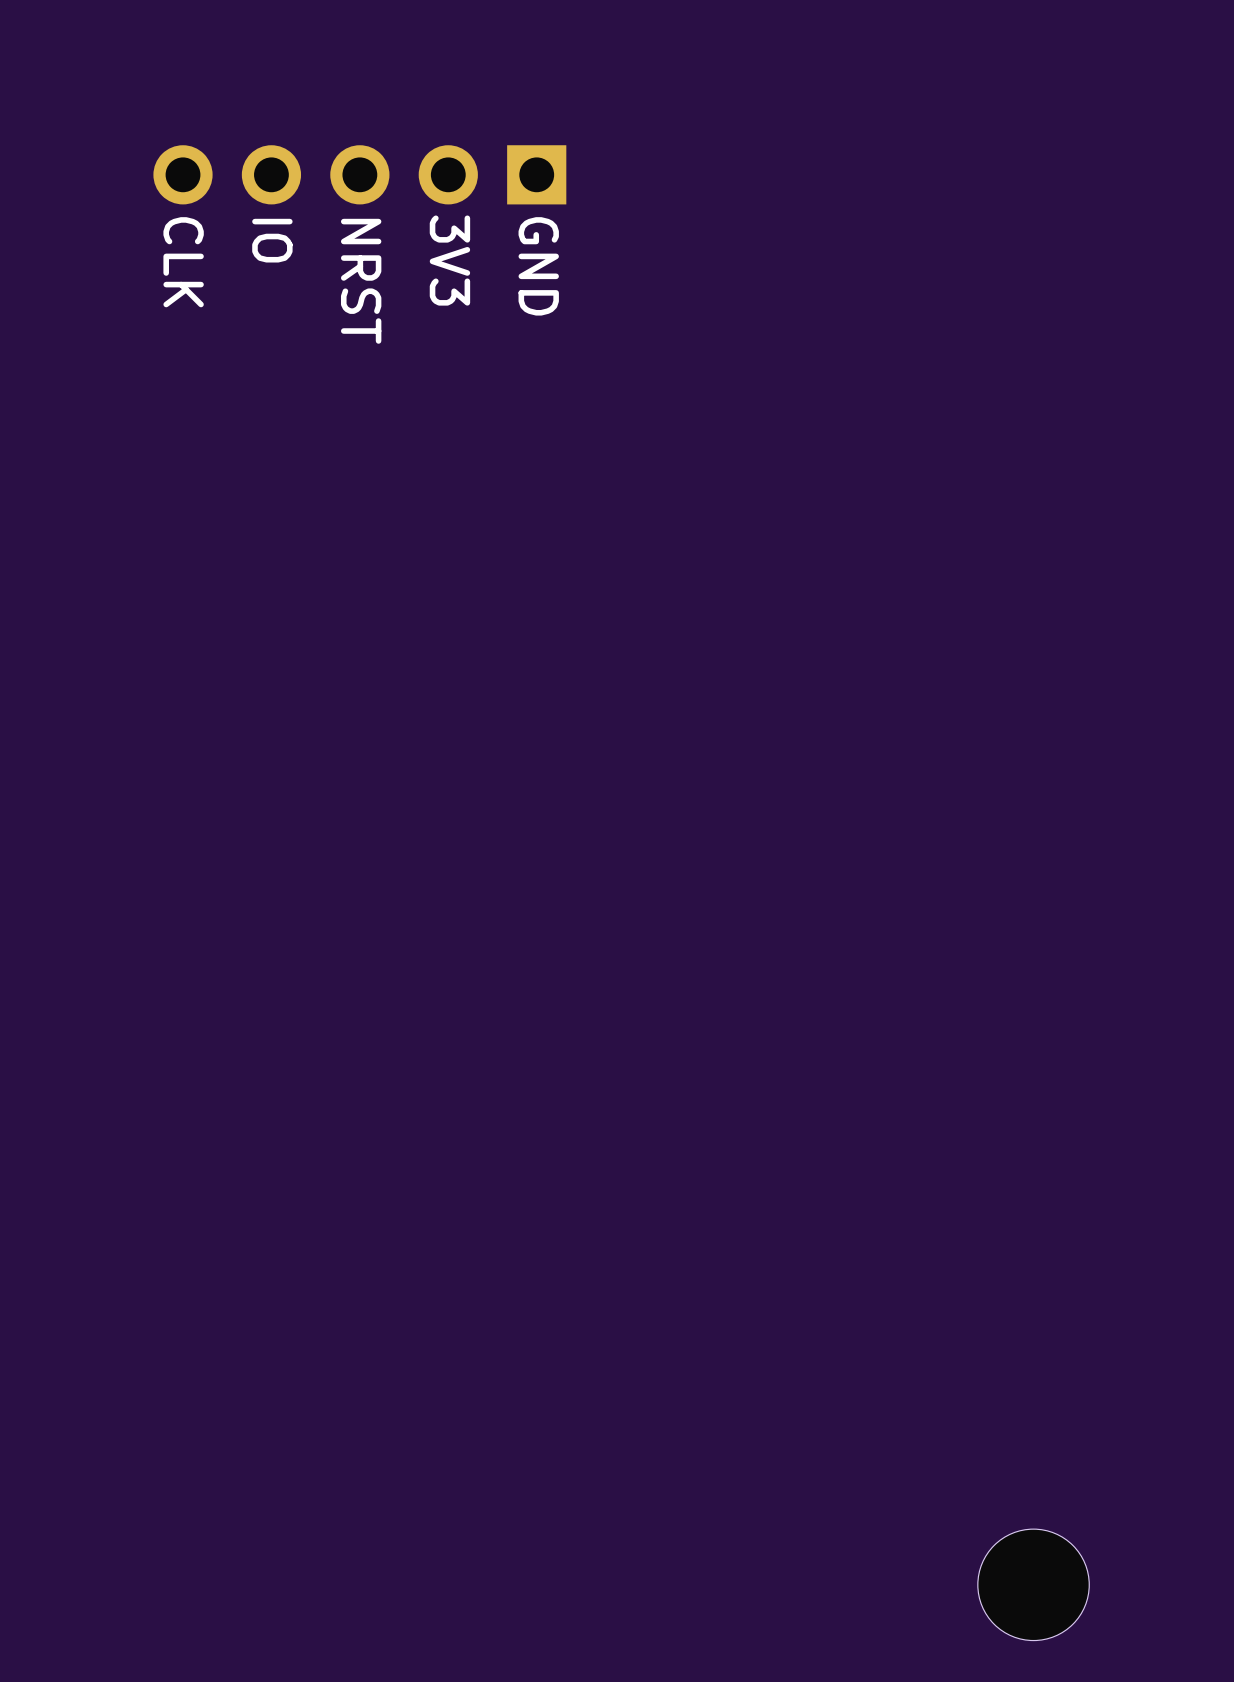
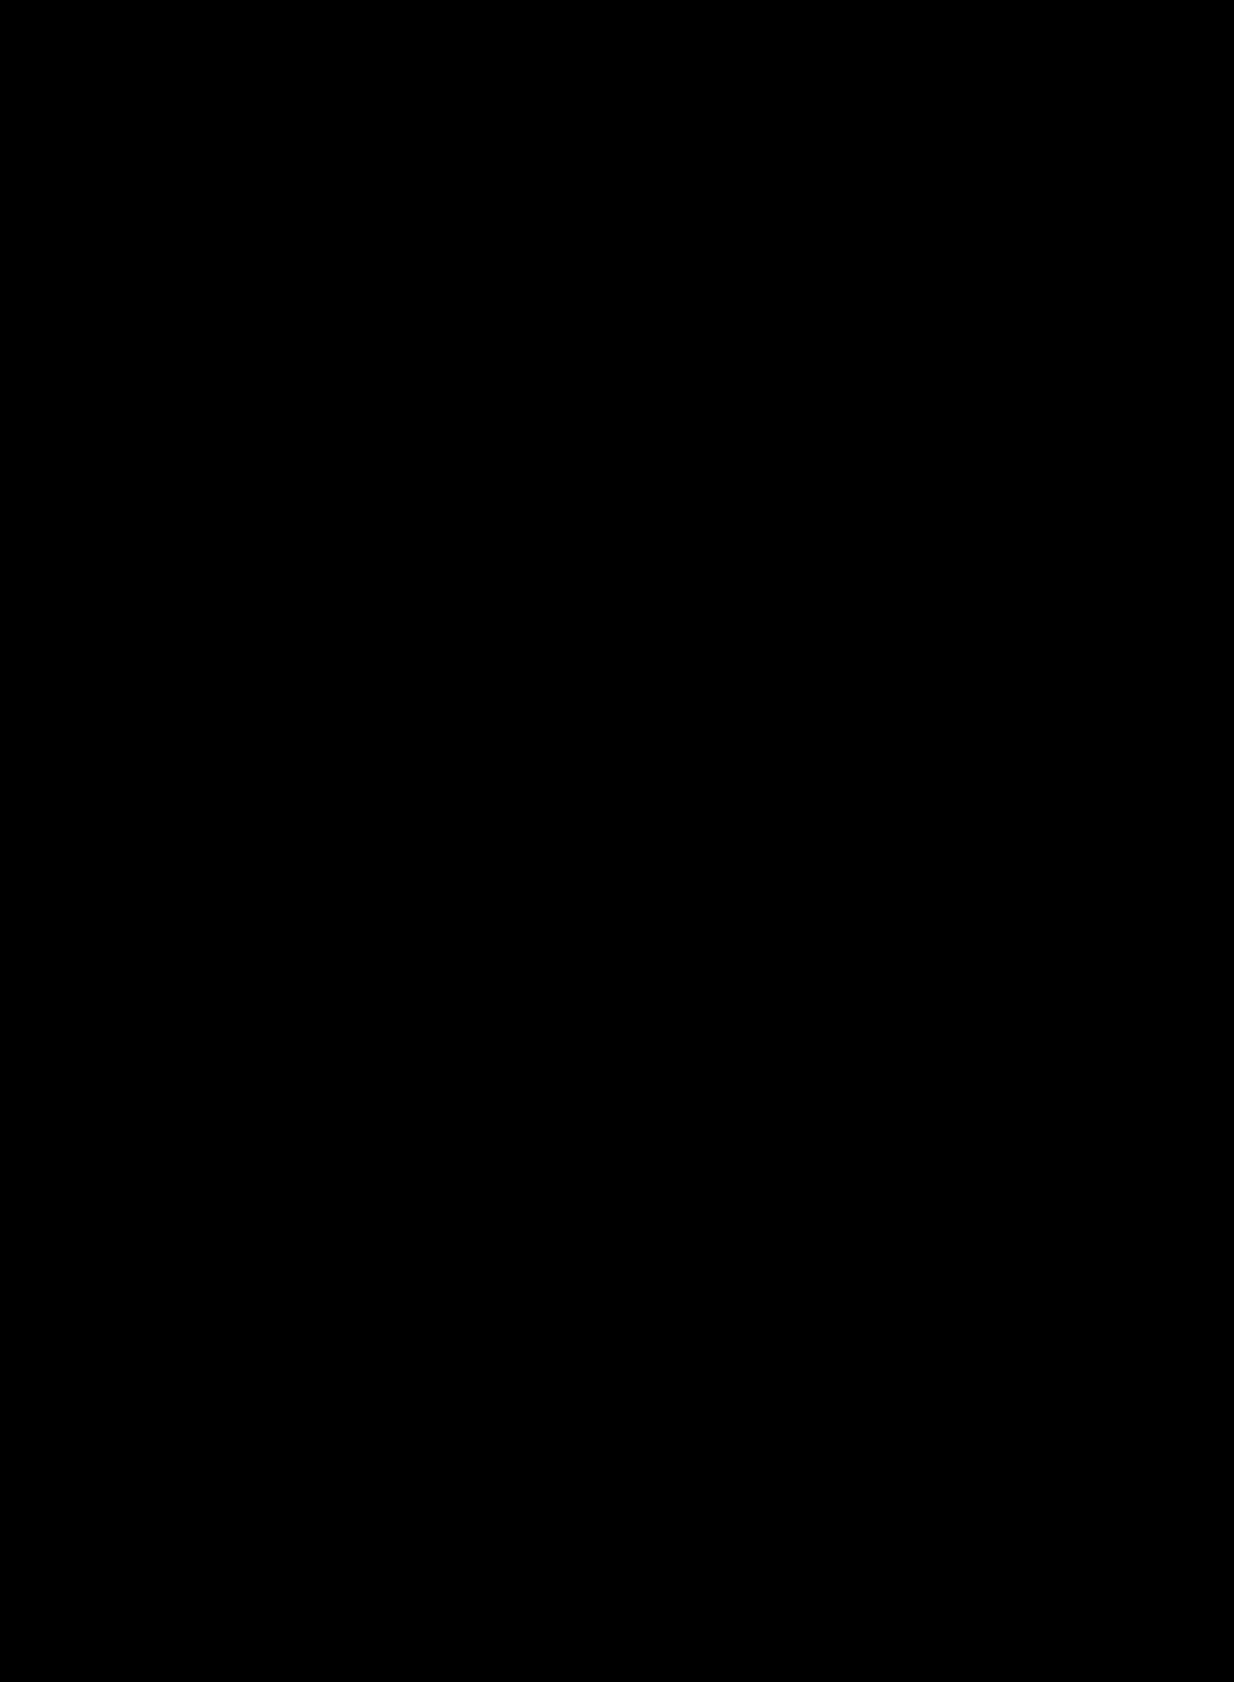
part: (359, 174) -> none
text: IO (272, 240) -> none
text: 3V3 (449, 260) -> none
text: CLK (183, 262) -> none
text: GND (538, 266) -> none
text: NRST (361, 281) -> none
part: (1033, 1584) -> none

